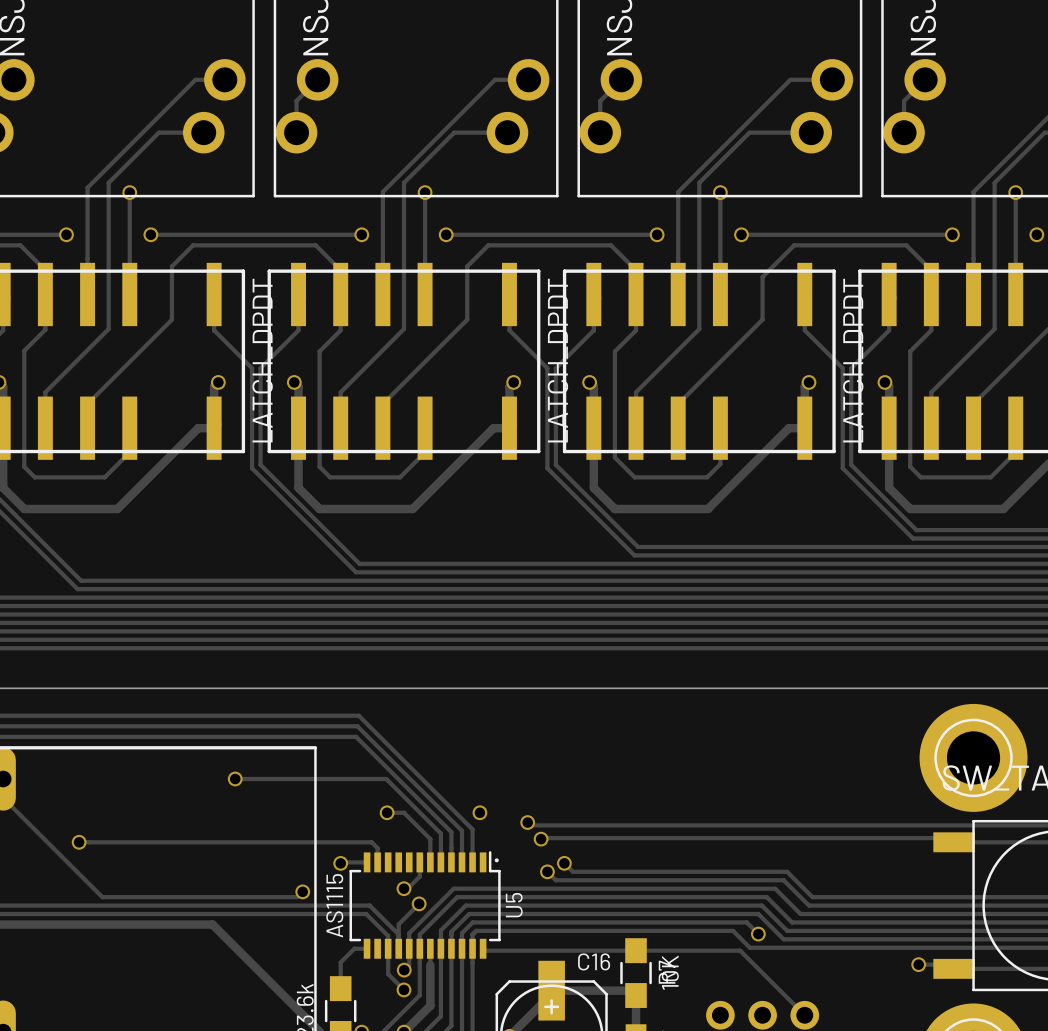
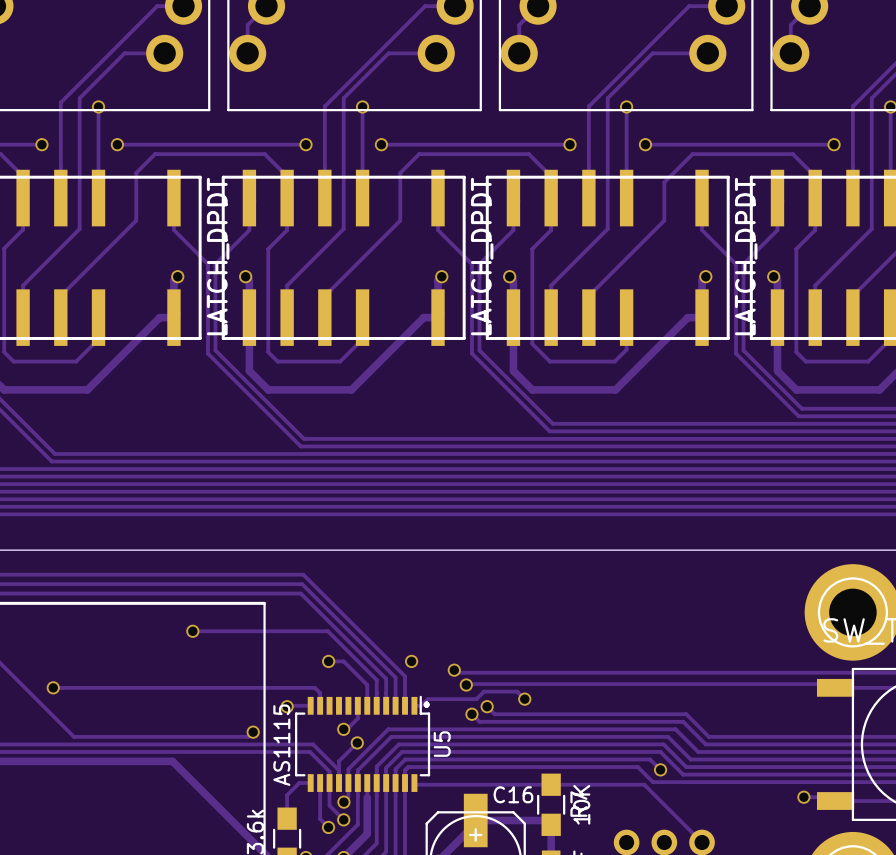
track: none -> (524, 699) (517, 691) (484, 691) (476, 699) (427, 699) (421, 705) (414, 705)
via: none -> (524, 699)
track: none -> (320, 783) (320, 819) (328, 827)
via: none -> (328, 827)

